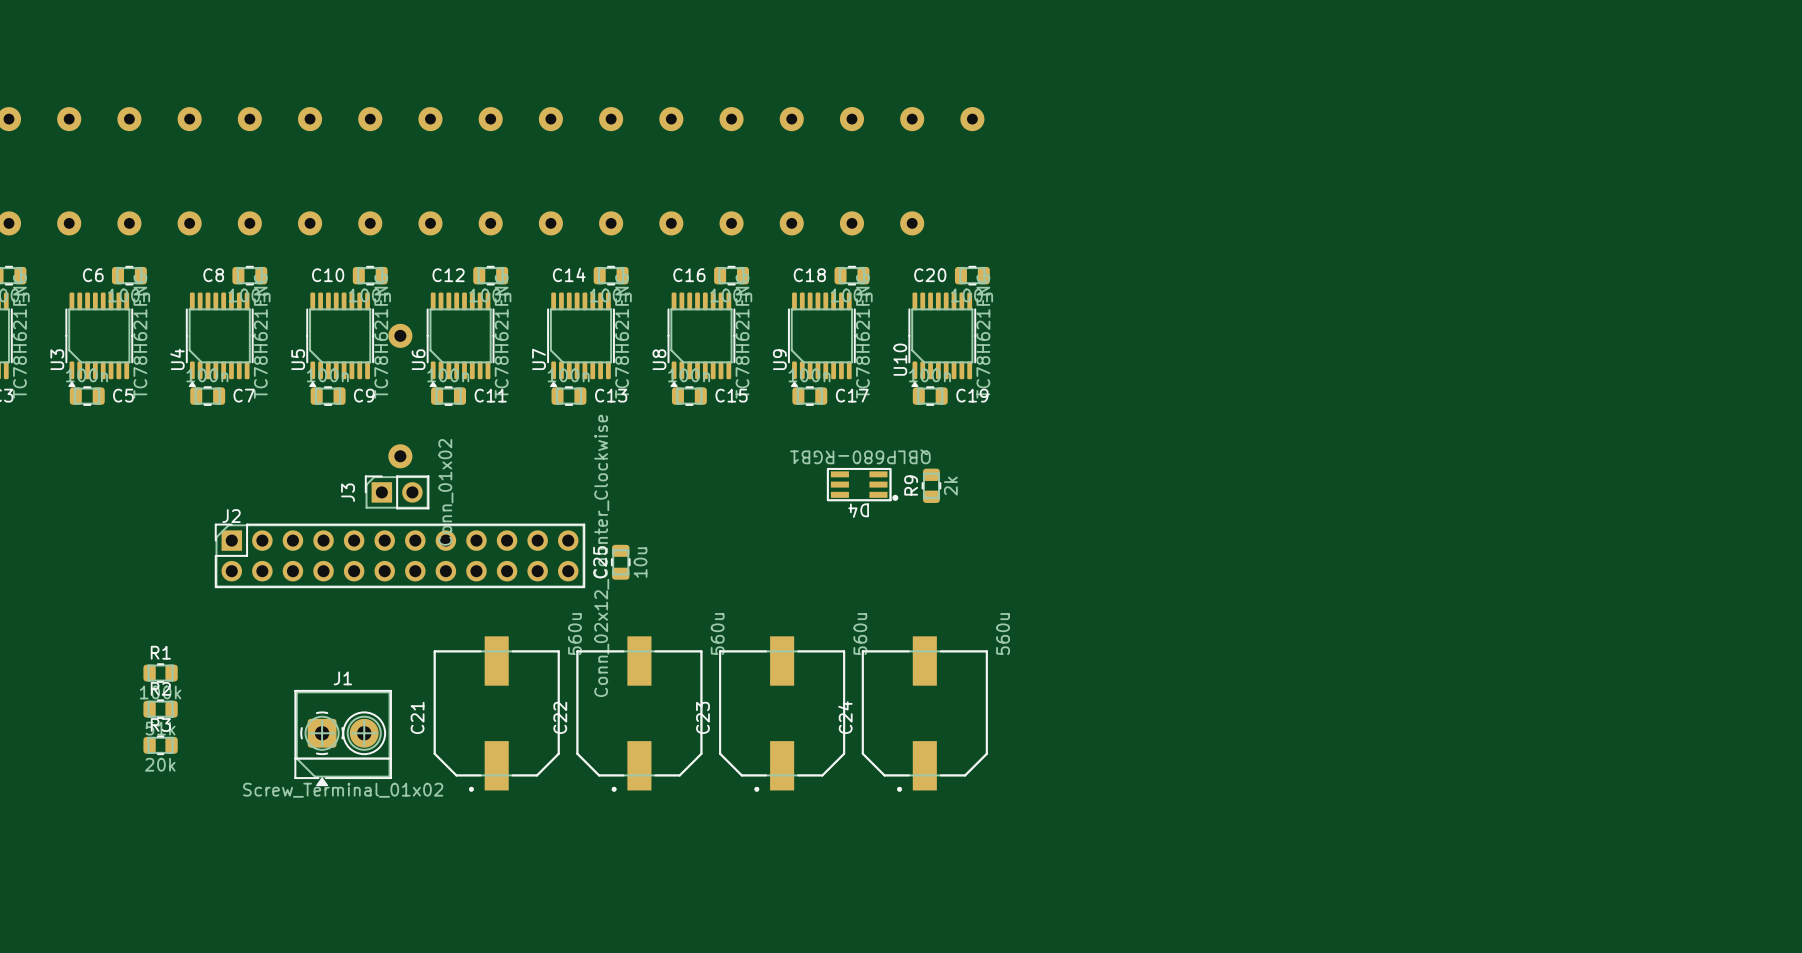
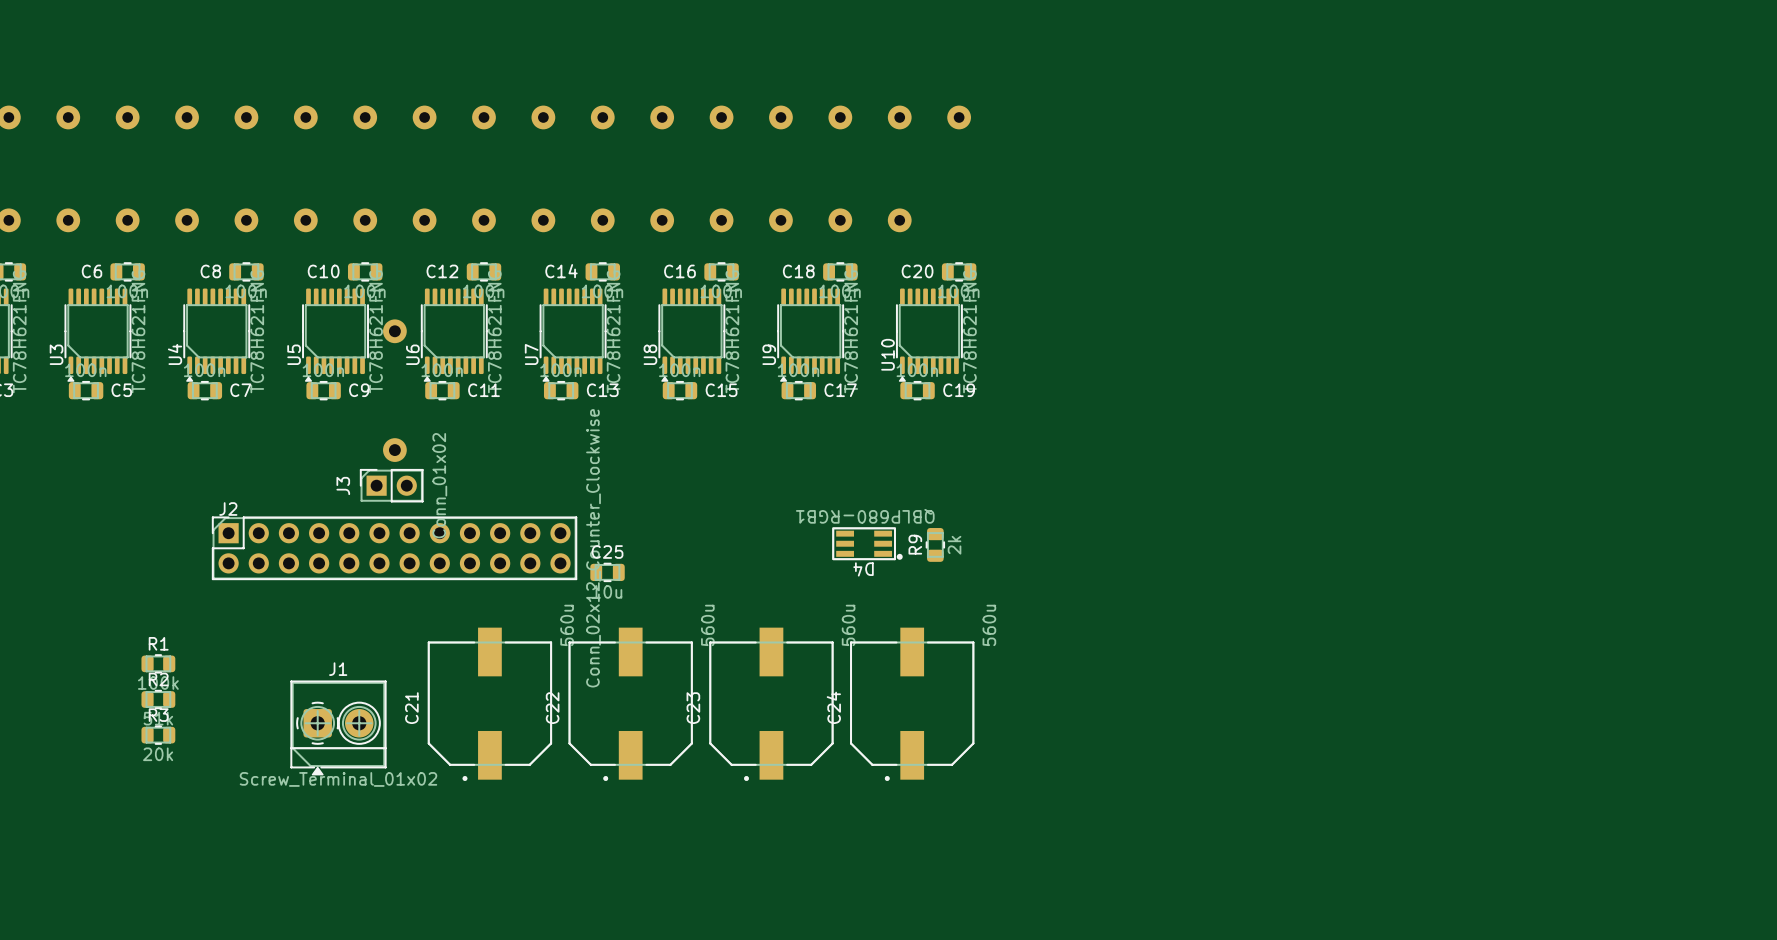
D4 position: (862, 484) -> (867, 543)
R9 position: (931, 485) -> (935, 544)
C25 rotation: 0° (620, 562) -> 90° clockwise (607, 572)

